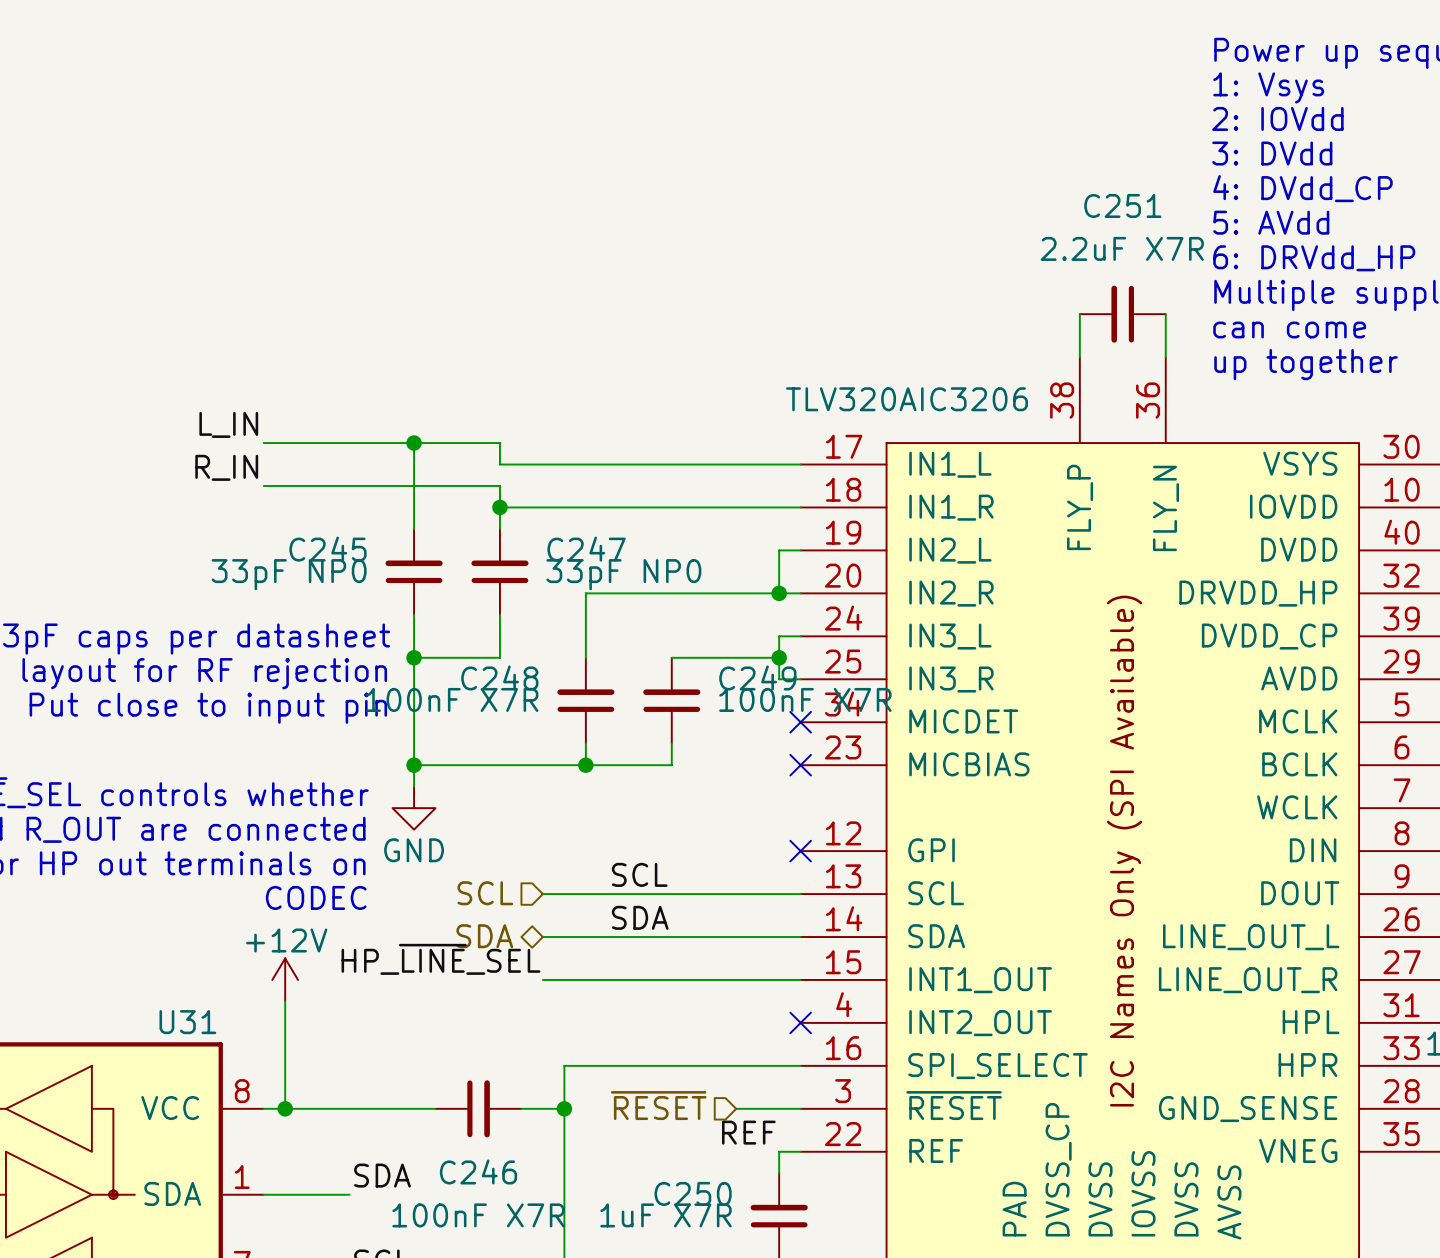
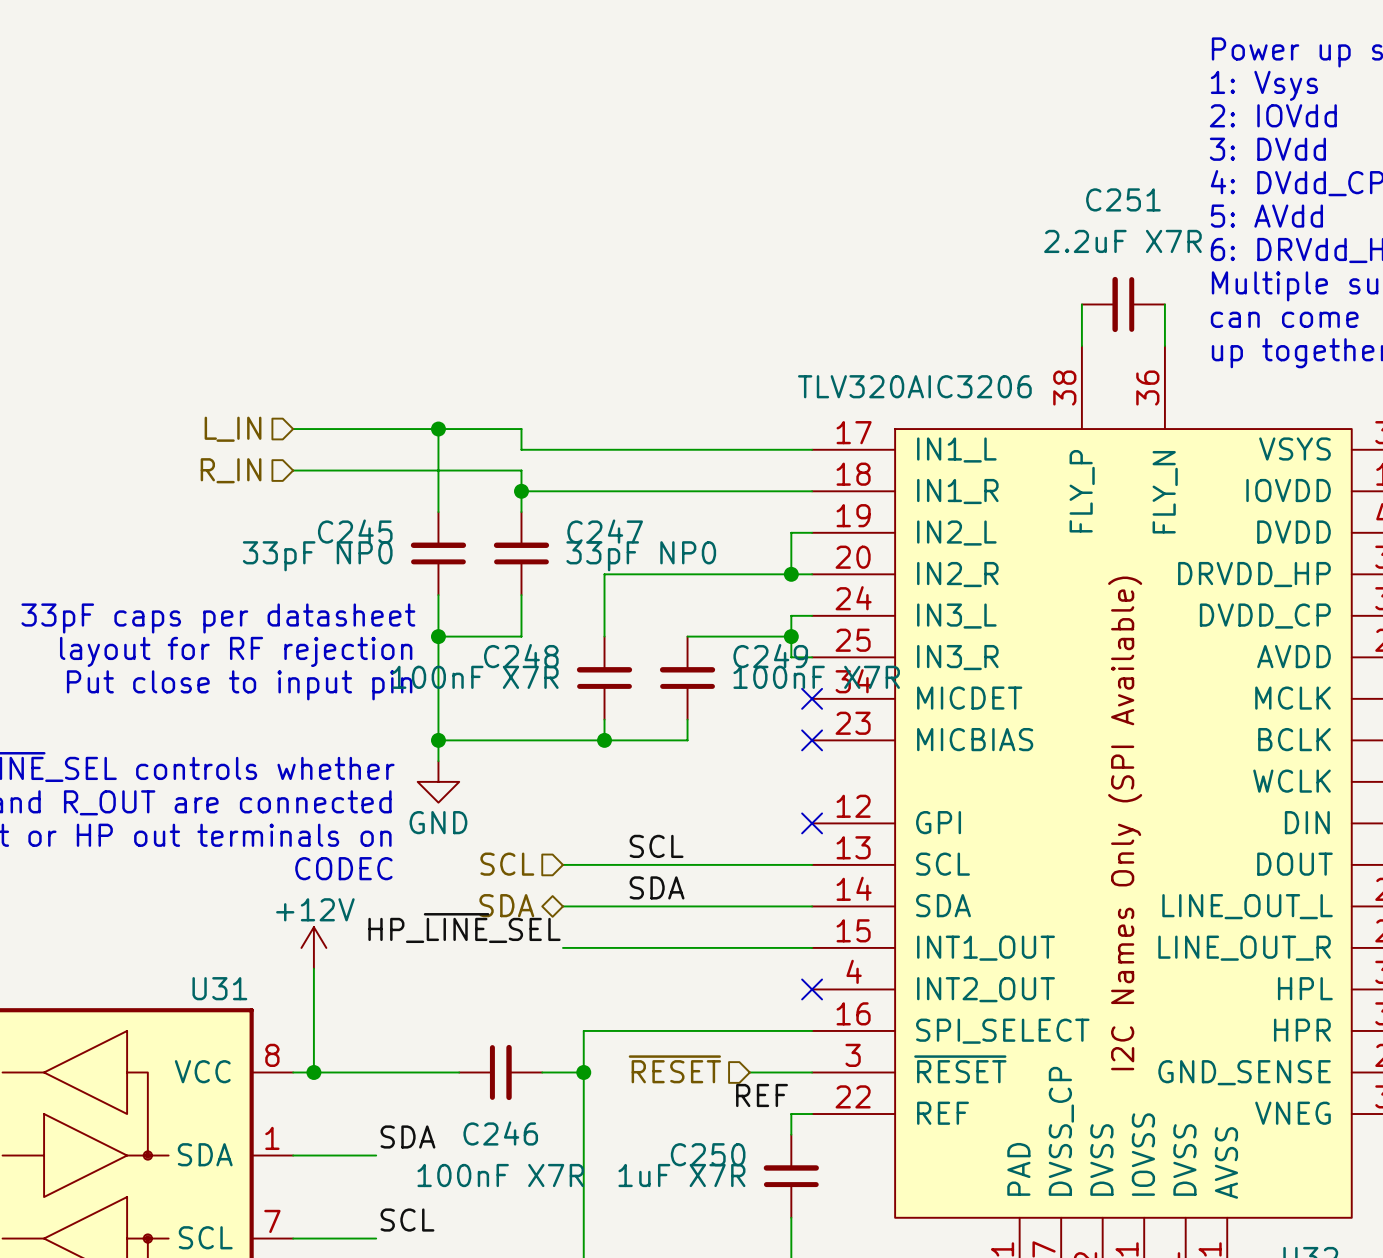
label: L_IN (228, 424) -> none
hierarchical label: none -> L_IN (233, 429)
label: R_IN (226, 467) -> none
hierarchical label: none -> R_IN (231, 470)

